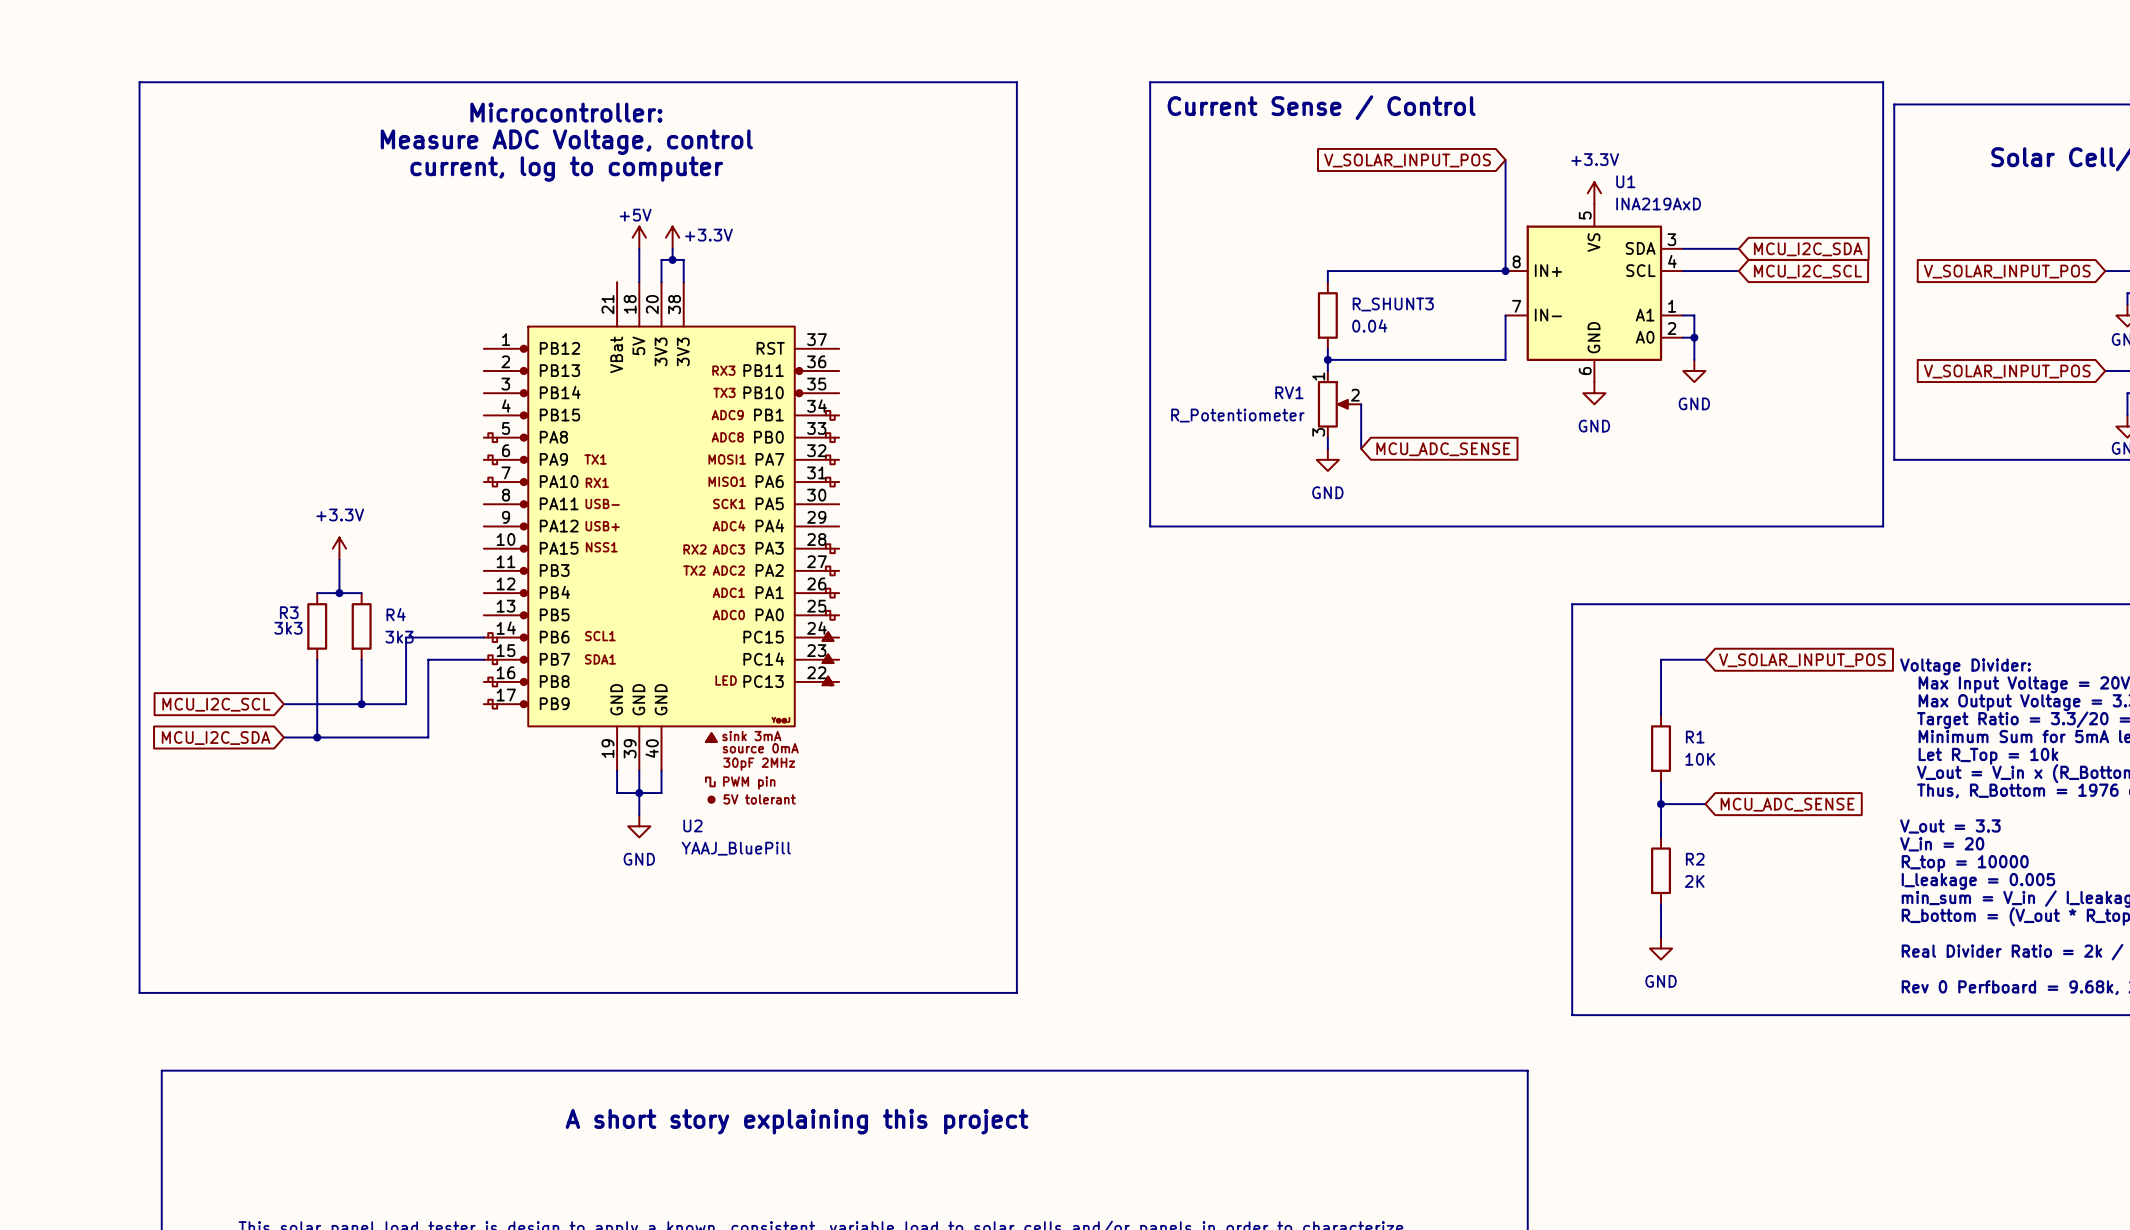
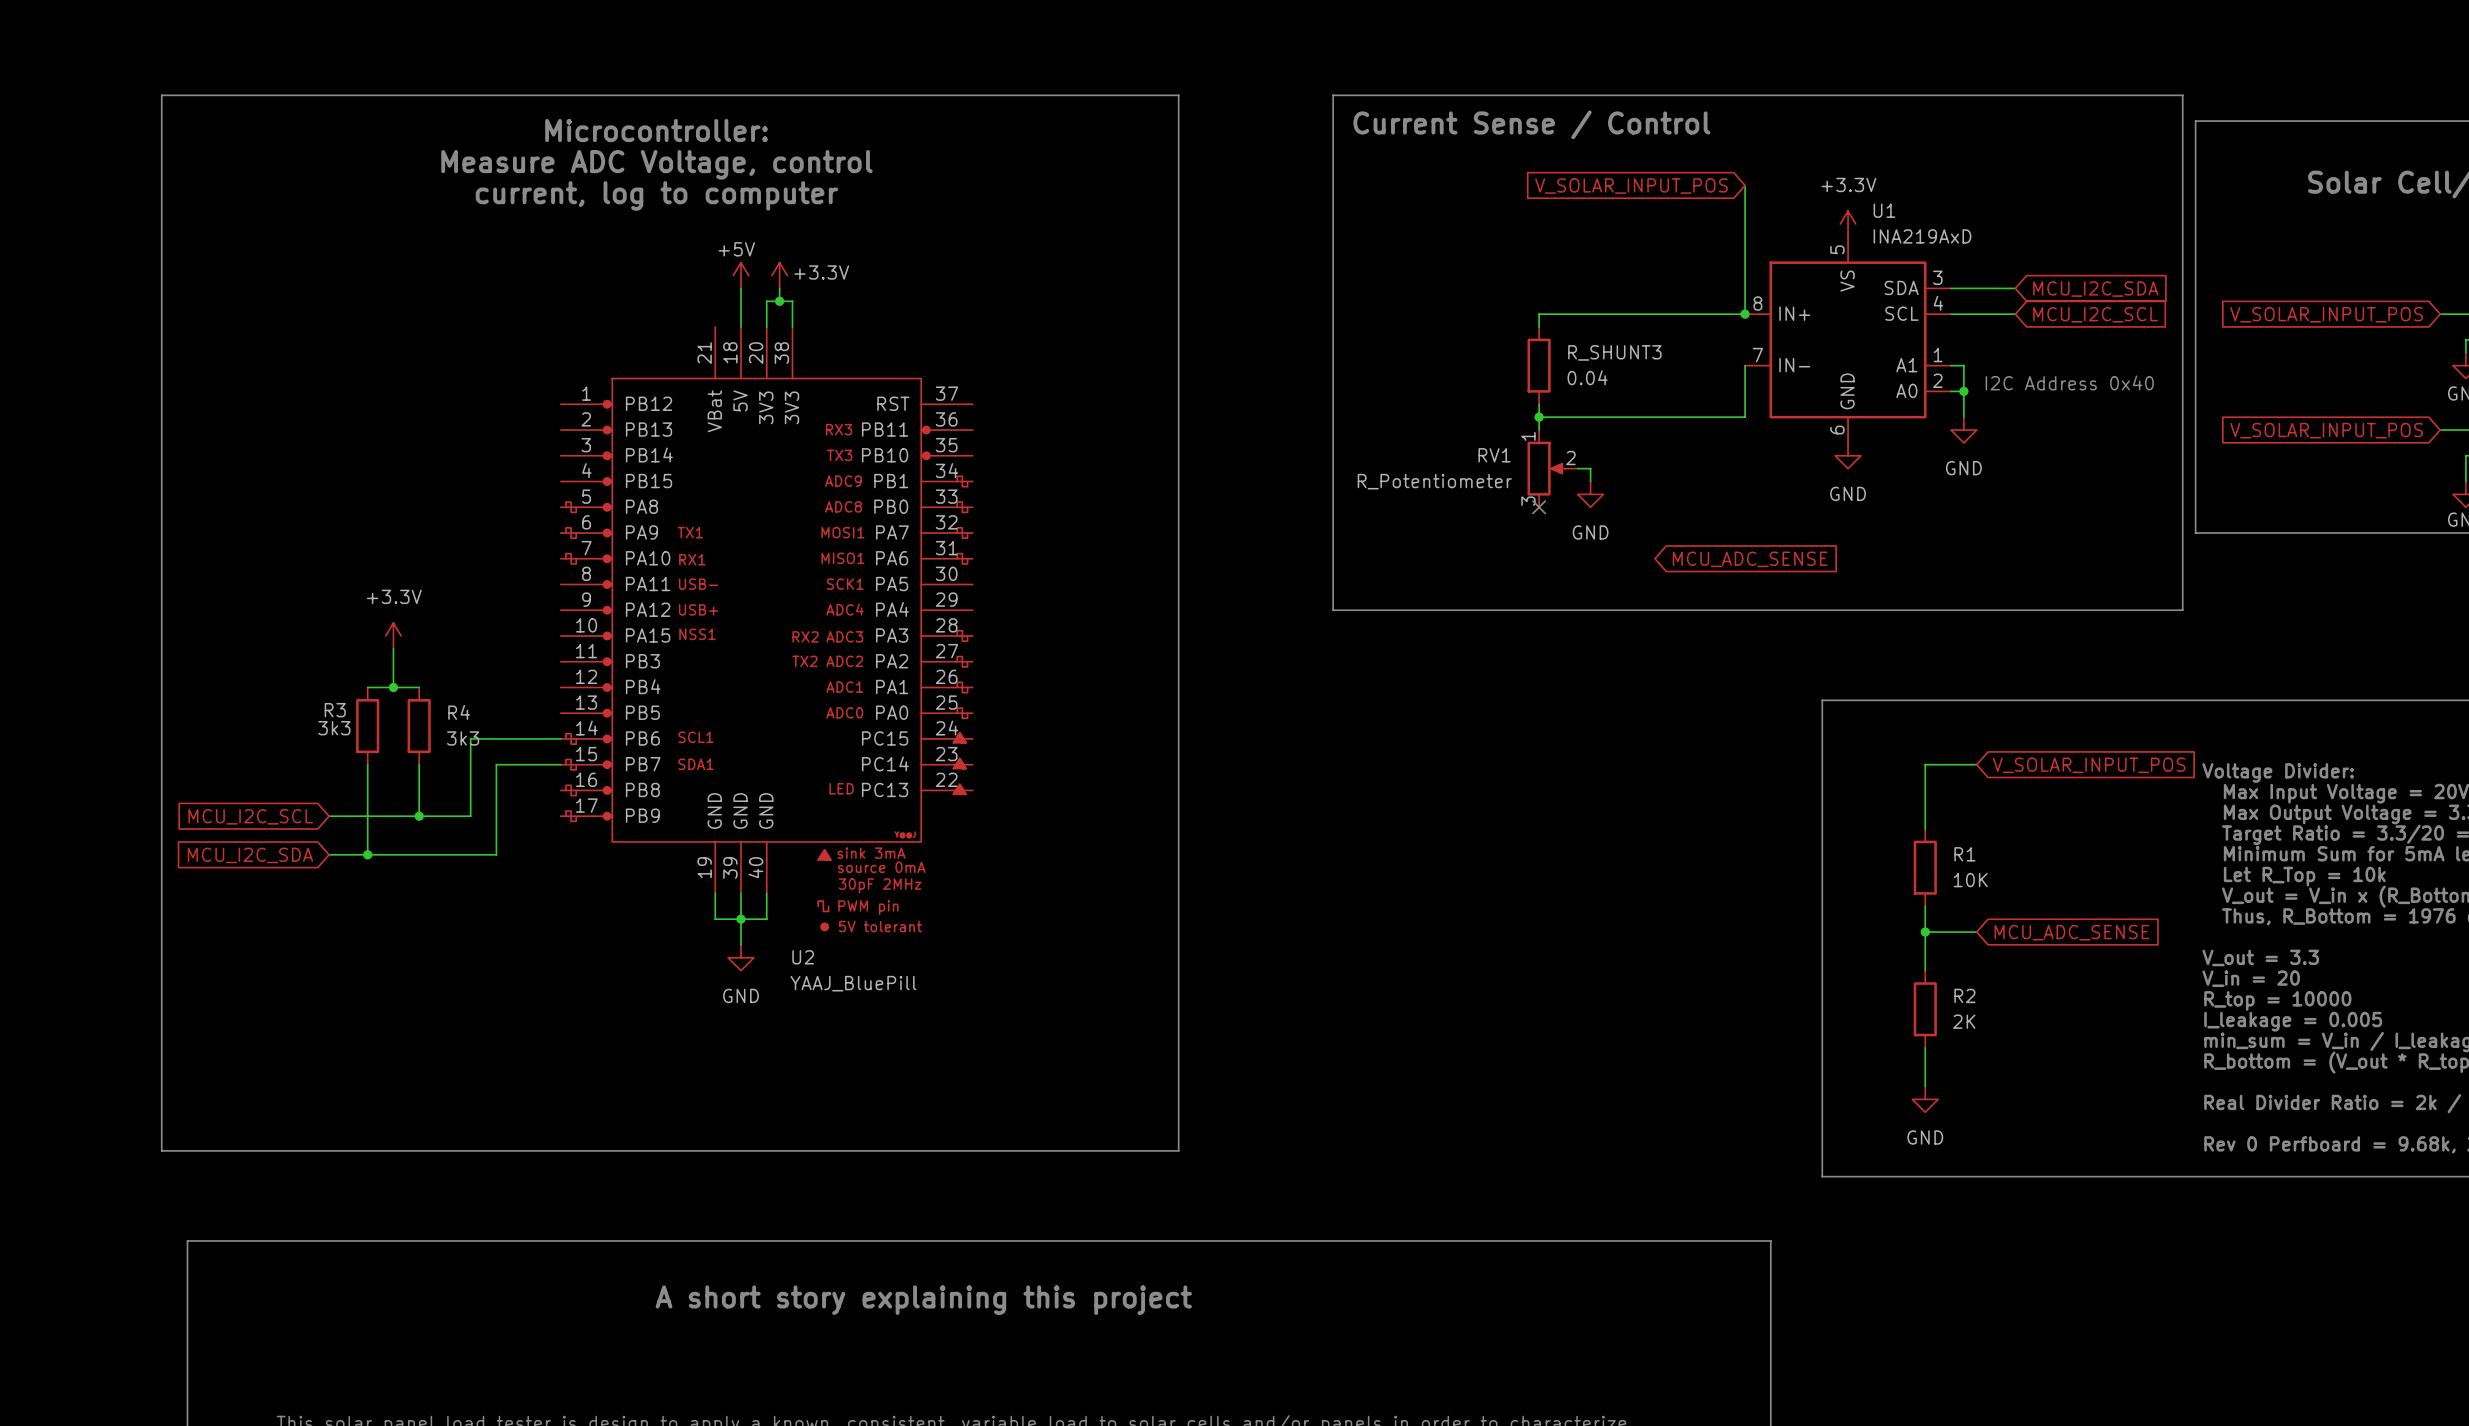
text: none -> I2C Address 0x40 (2069, 382)
wire: (1361, 404) (1361, 448) -> (1577, 468) (1590, 468) (1590, 481)
wire: (1327, 437) (1327, 448) -> none
no-connect mark: none -> (1539, 507)
global label position: MCU_ADC_SENSE (1443, 449) -> MCU_ADC_SENSE (1750, 559)
power symbol position: GND (1327, 459) -> GND (1590, 494)

